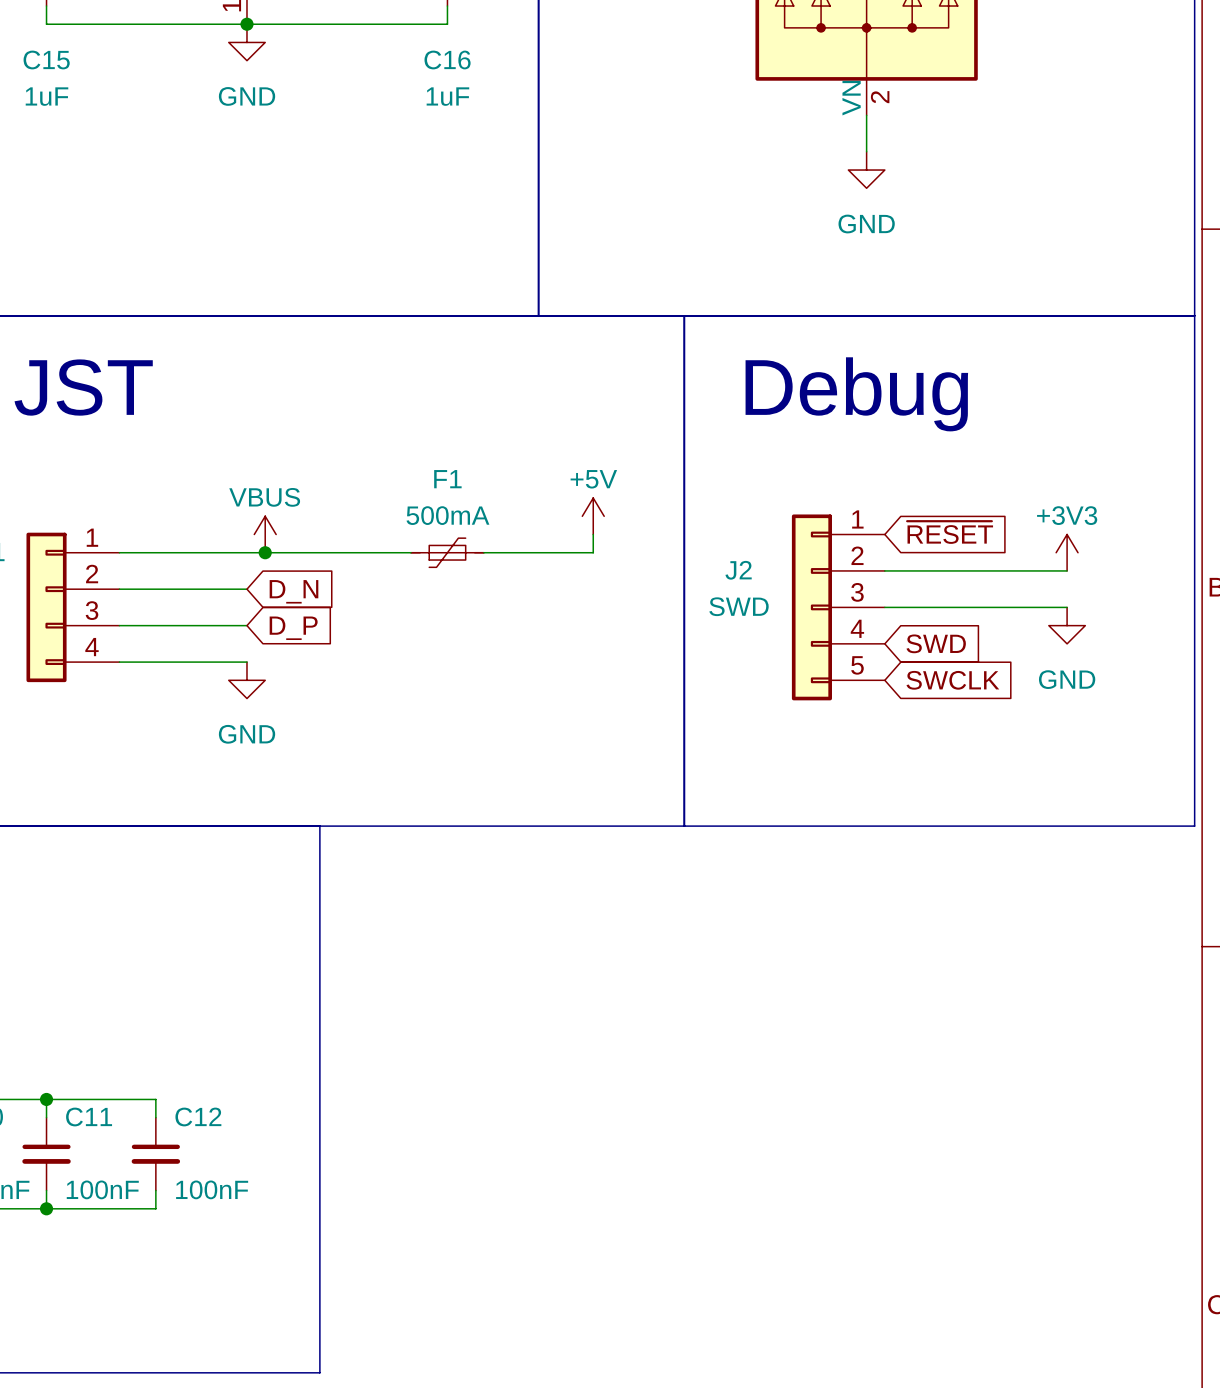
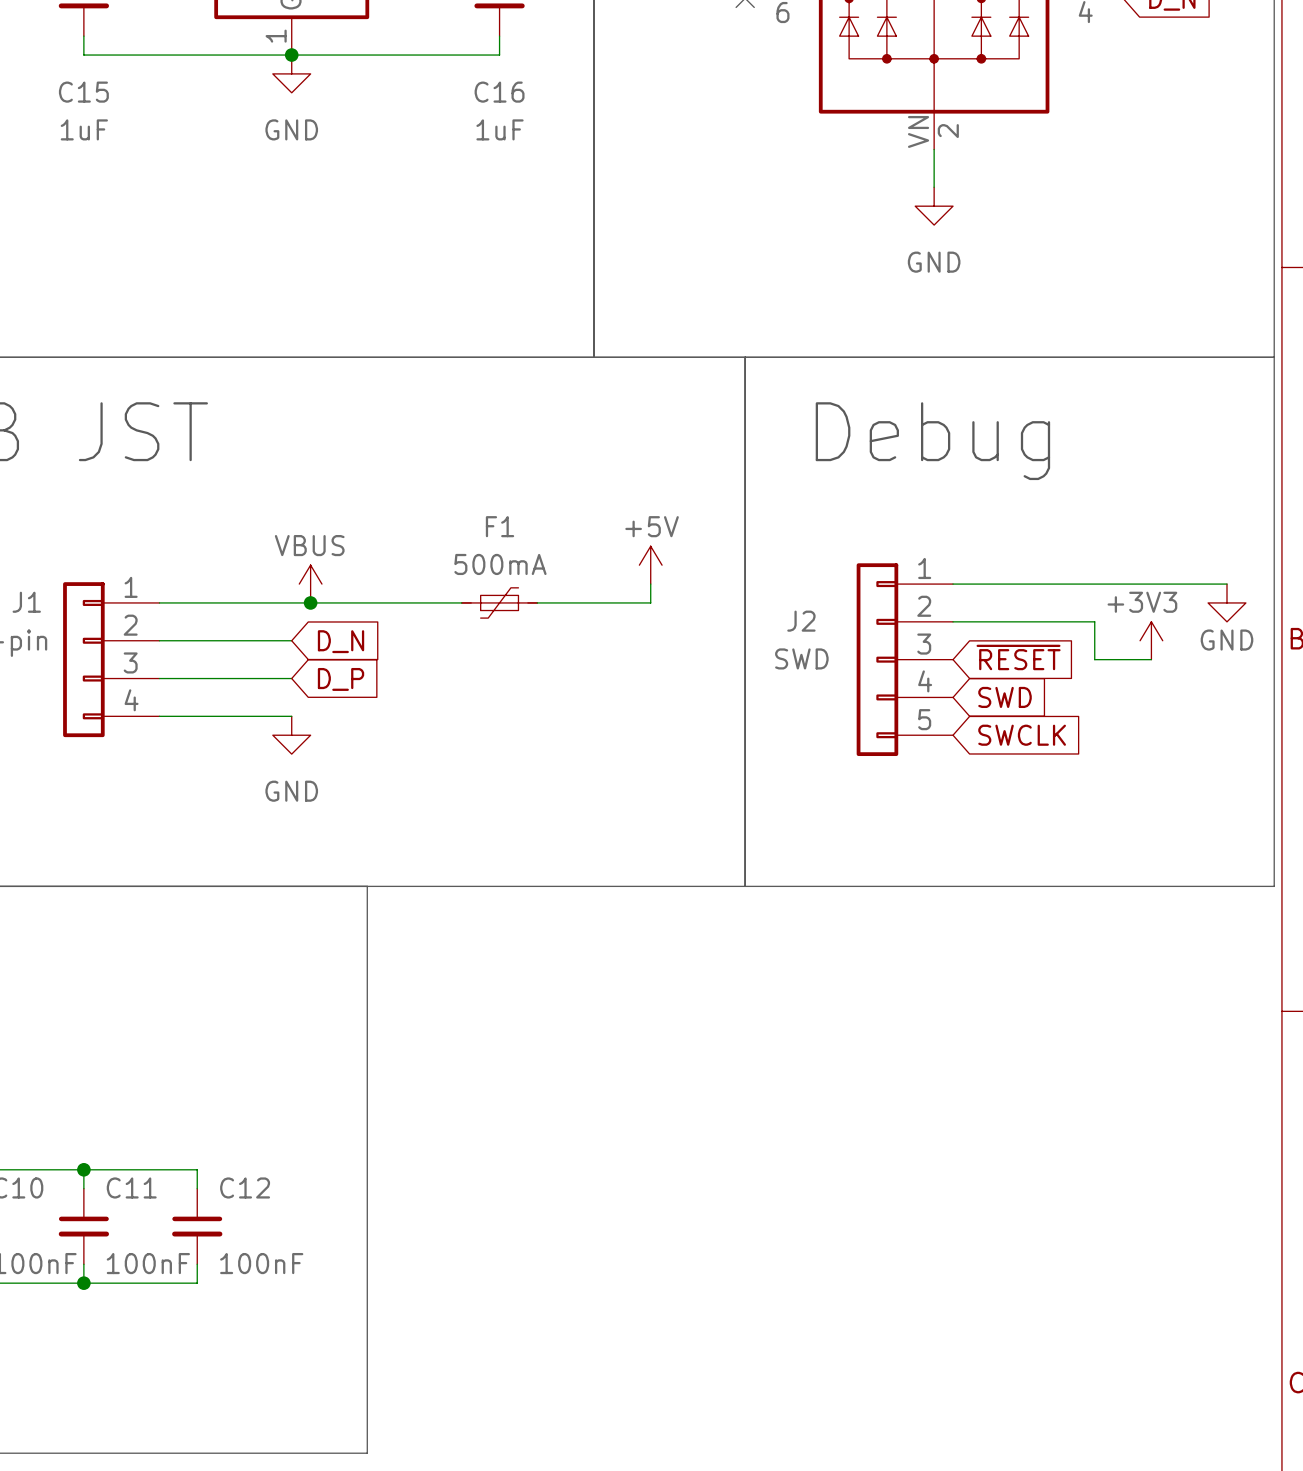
power symbol text position: +3V3 (1067, 515) -> +3V3 (1142, 602)
global label position: ~{RESET} (950, 532) -> ~{RESET} (1018, 657)
wire: none -> (953, 584) (1226, 584)
power symbol position: +3V3 (1067, 552) -> +3V3 (1151, 640)
wire: (1021, 570) (1067, 570) -> (1094, 621) (1094, 659)
wire: (884, 607) (1021, 607) -> none
wire: none -> (1141, 659) (1151, 659)
power symbol position: GND (1067, 625) -> GND (1226, 602)
power symbol text position: GND (1067, 679) -> GND (1226, 640)

